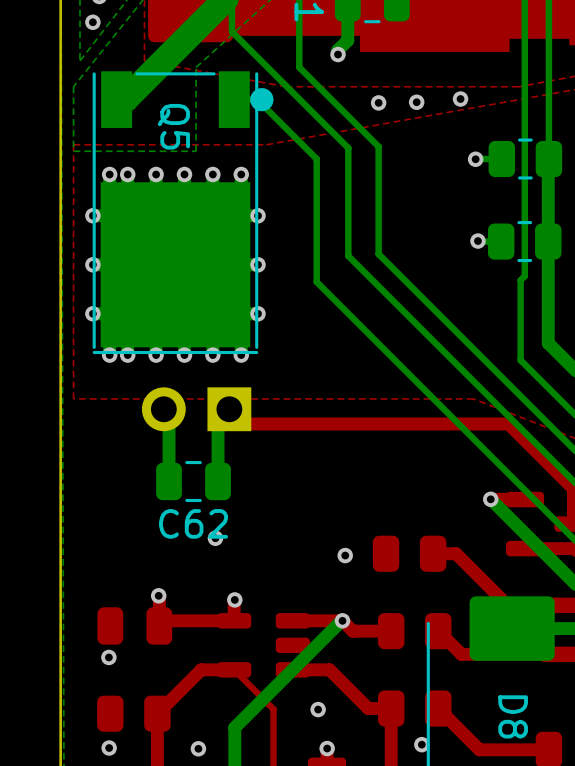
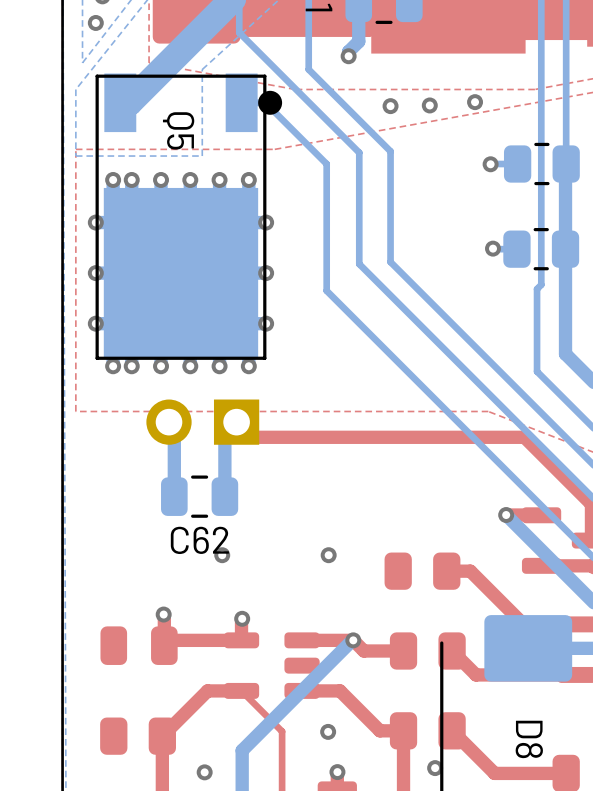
Q5 footprint: [92, 71, 274, 355] -> [95, 73, 283, 360]
via position: (345, 555) -> (328, 555)
via: (108, 657) -> none
via: (109, 748) -> none

